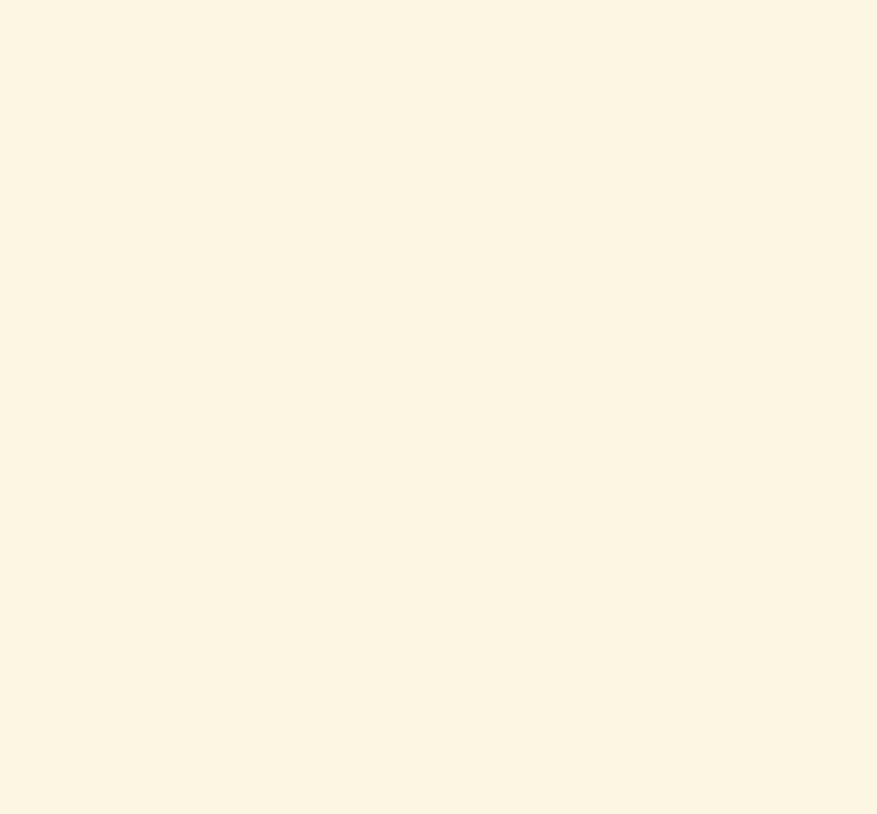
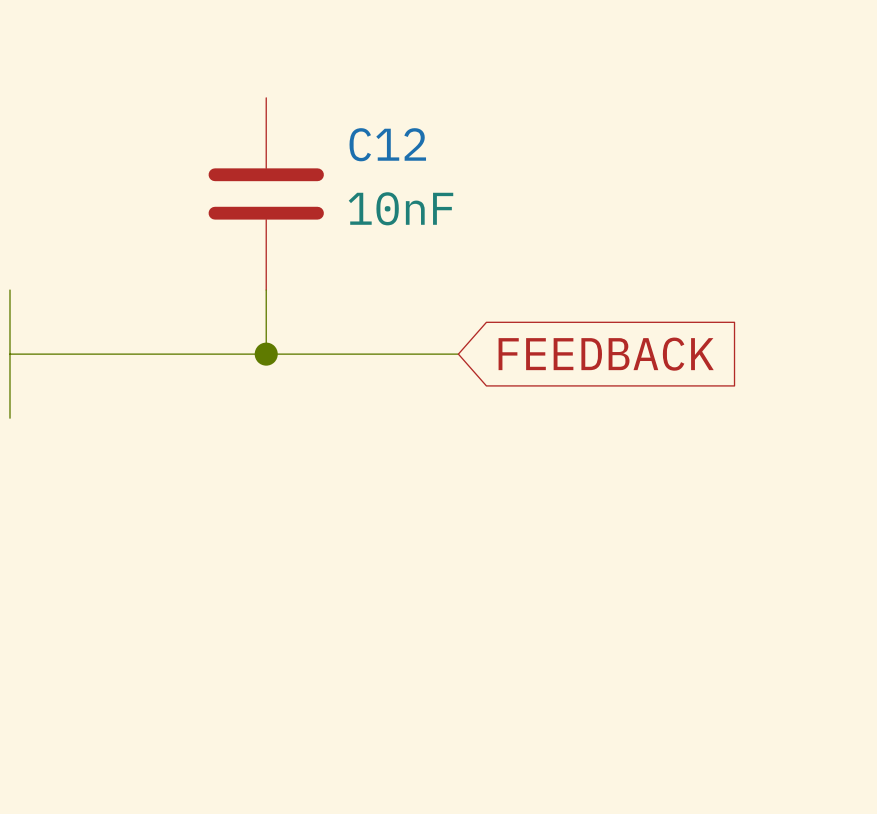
C12: none -> 10nF (266, 193)
wire: none -> (9, 290) (9, 418)
wire: none -> (266, 290) (266, 354)
wire: none -> (9, 354) (458, 354)
junction: none -> (266, 354)
global label: none -> FEEDBACK (606, 354)

